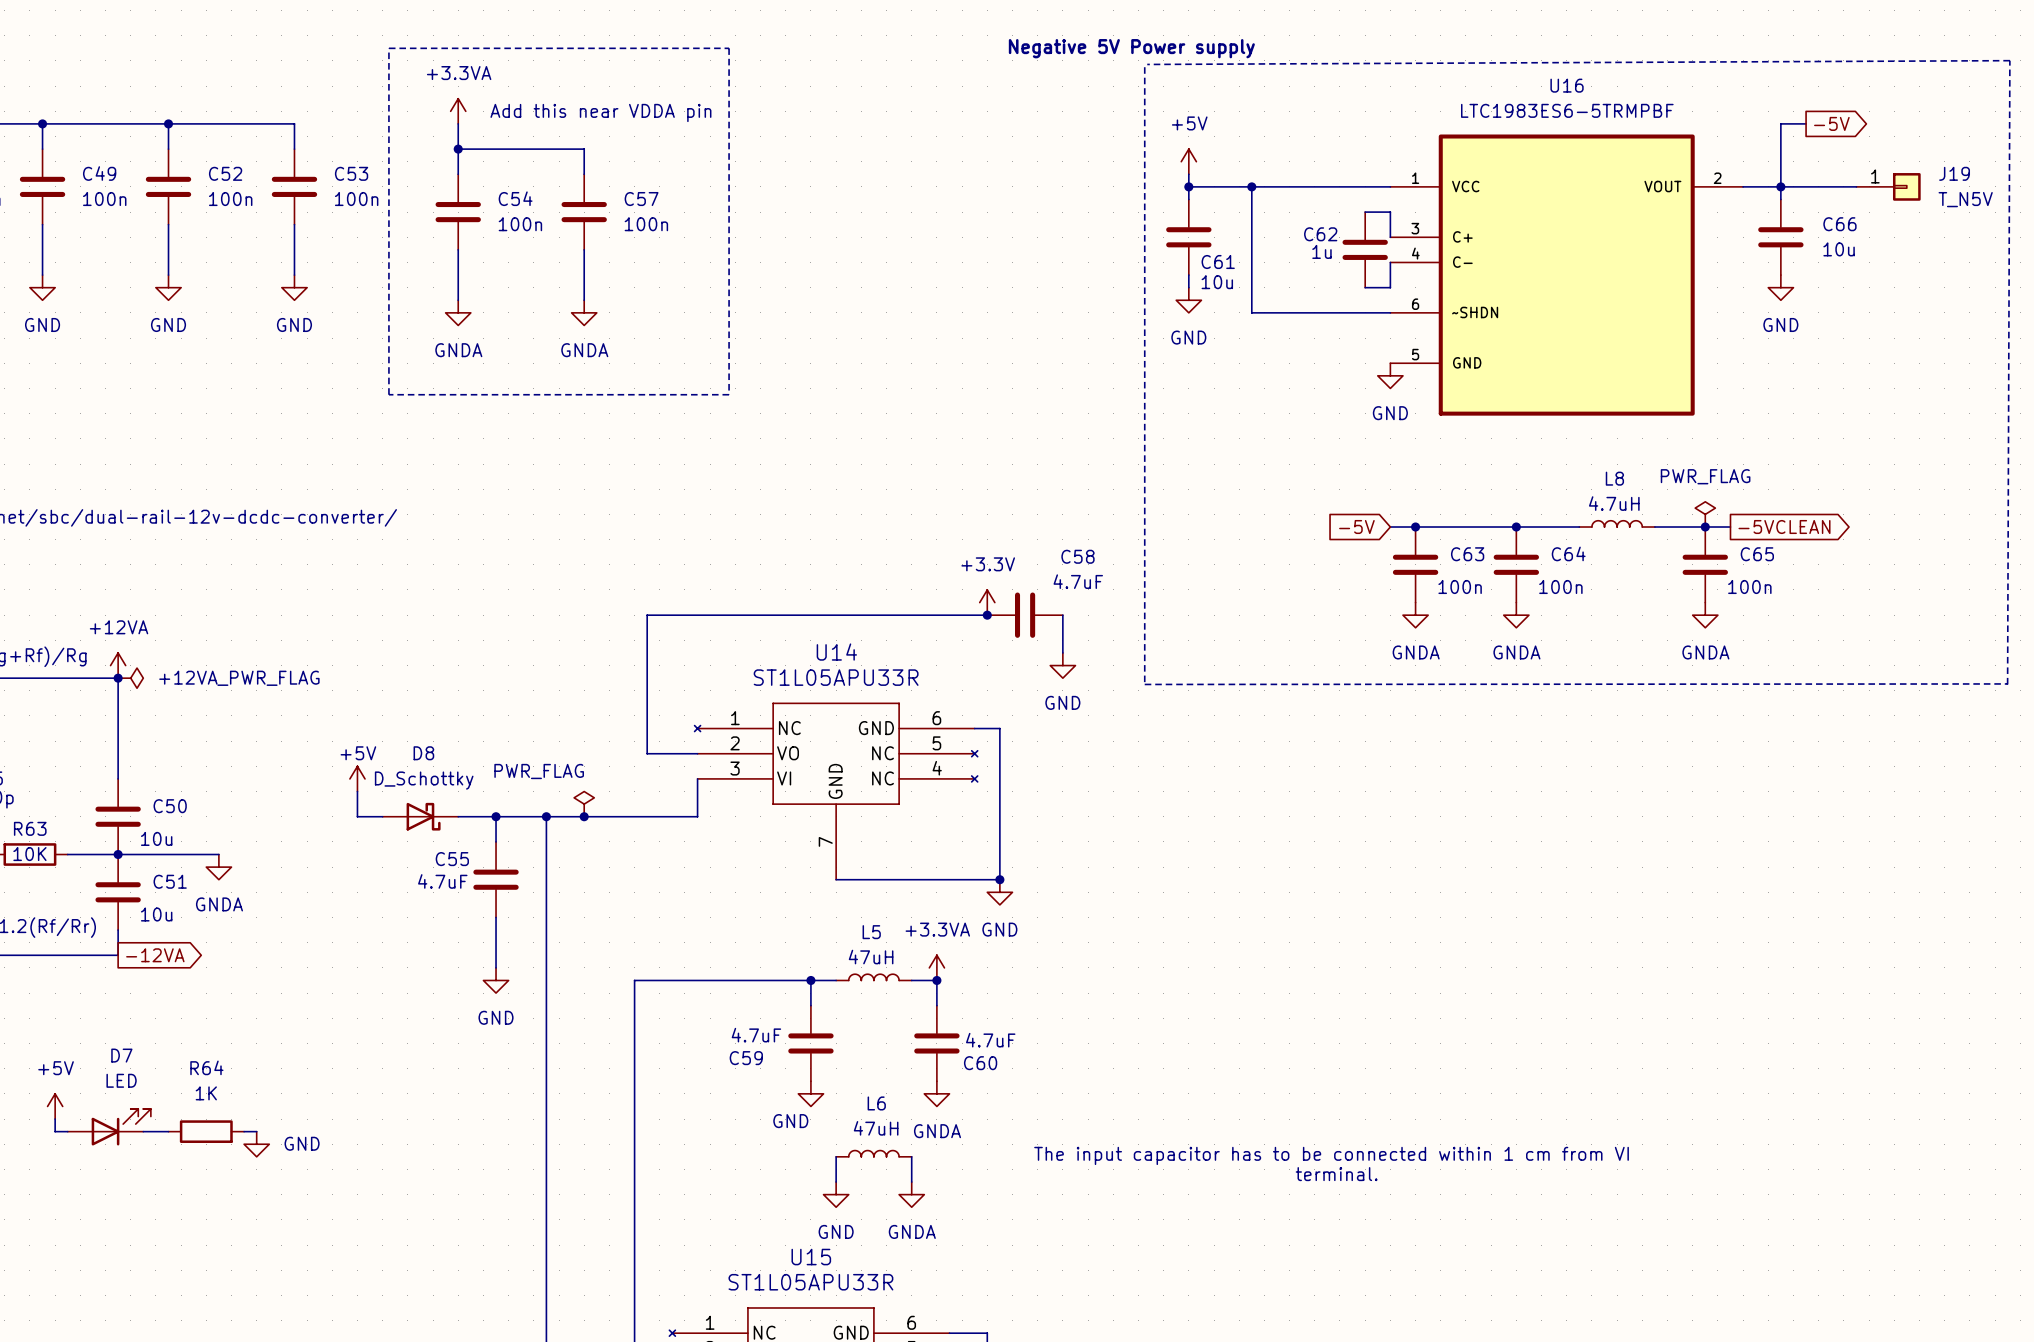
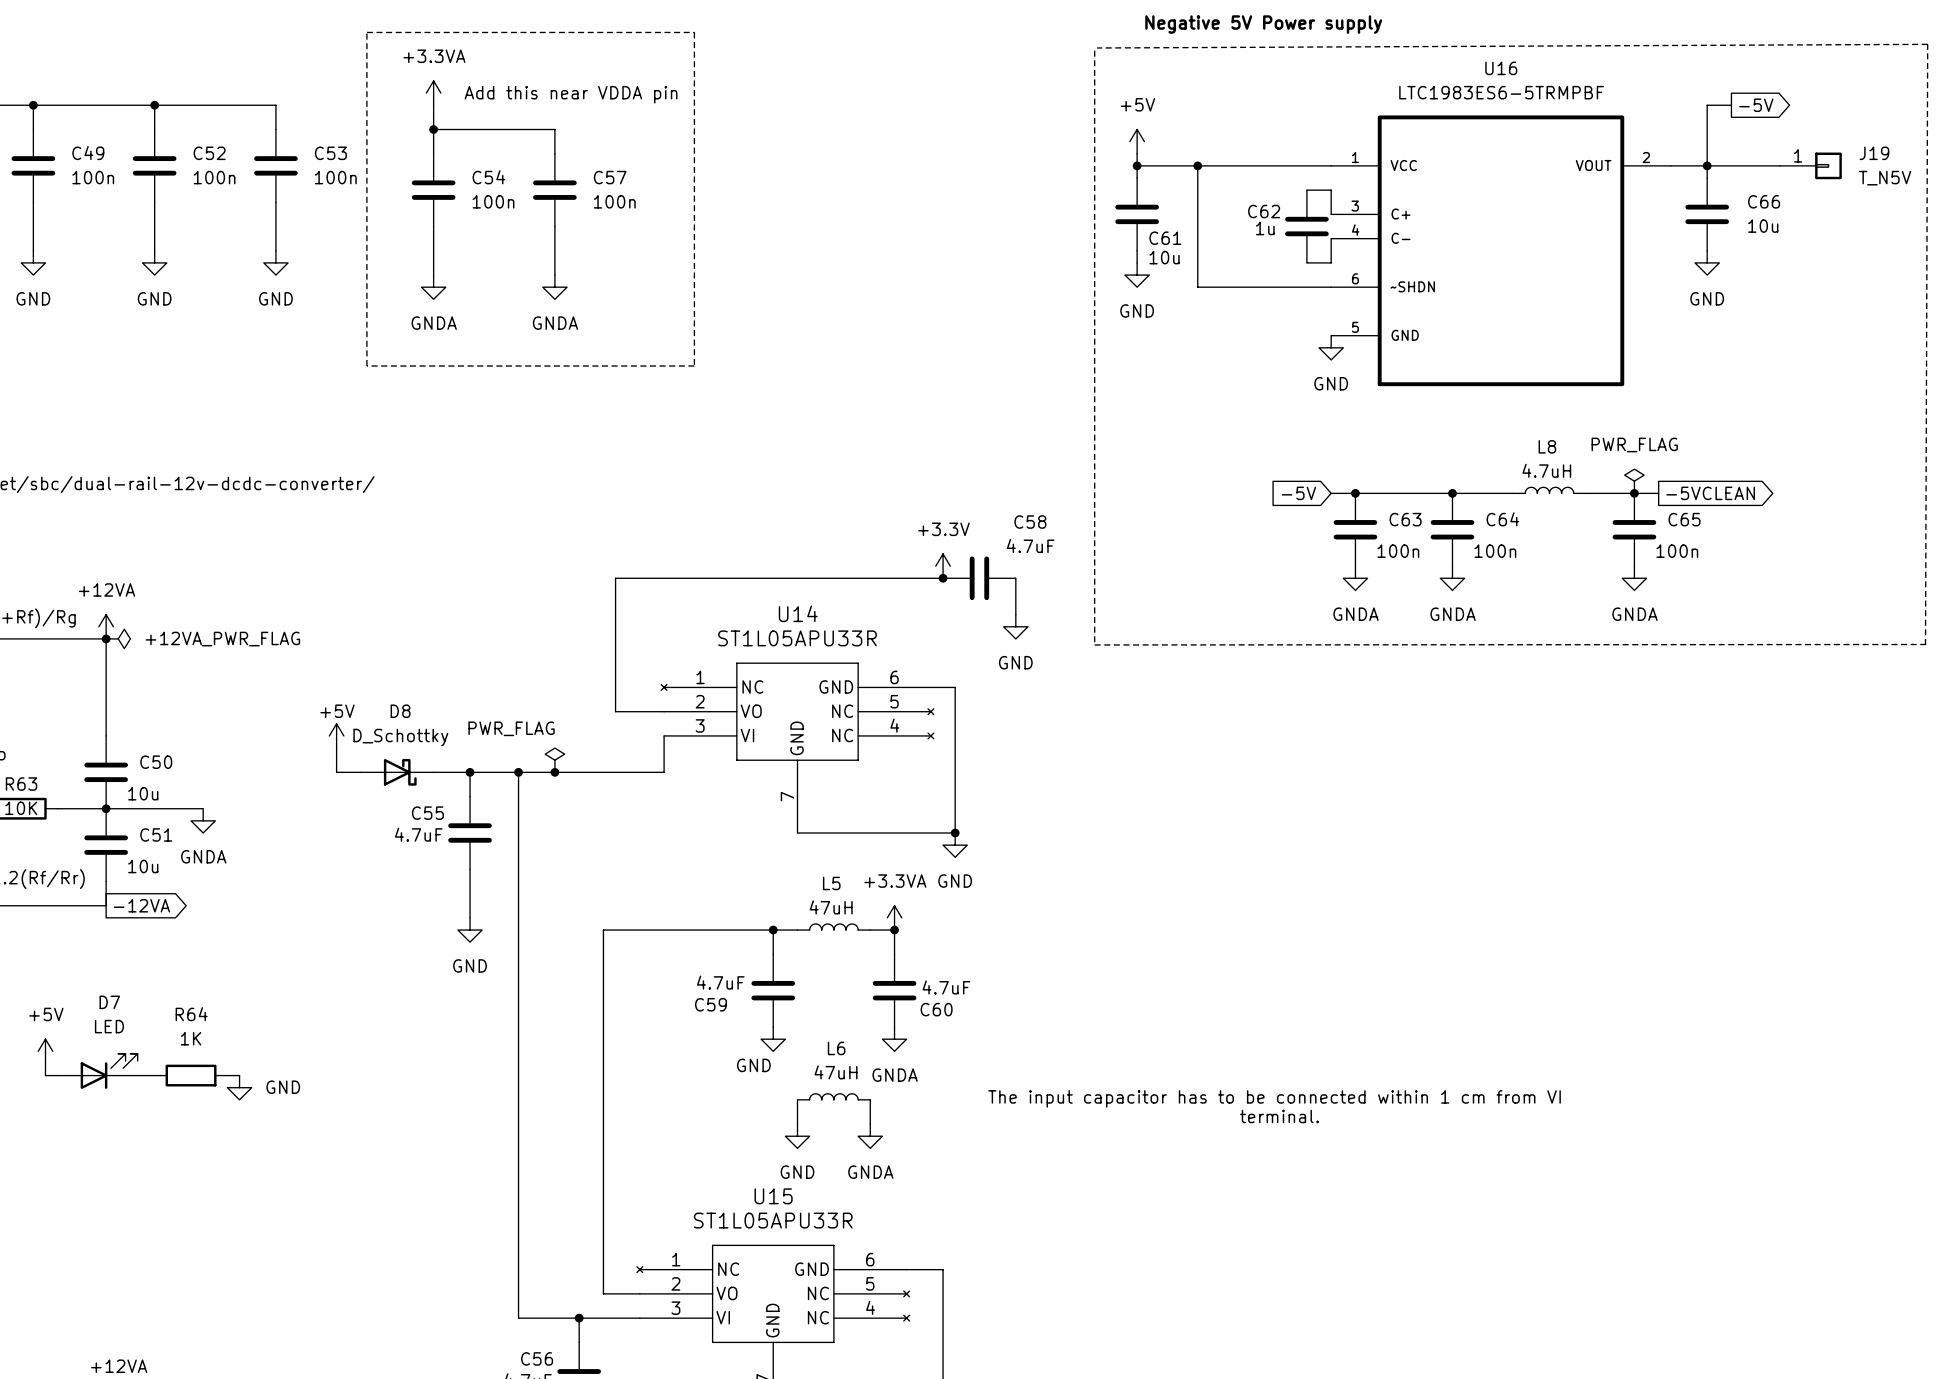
text position: Negative 5V Power supply (1131, 48) -> Negative 5V Power supply (1263, 24)

